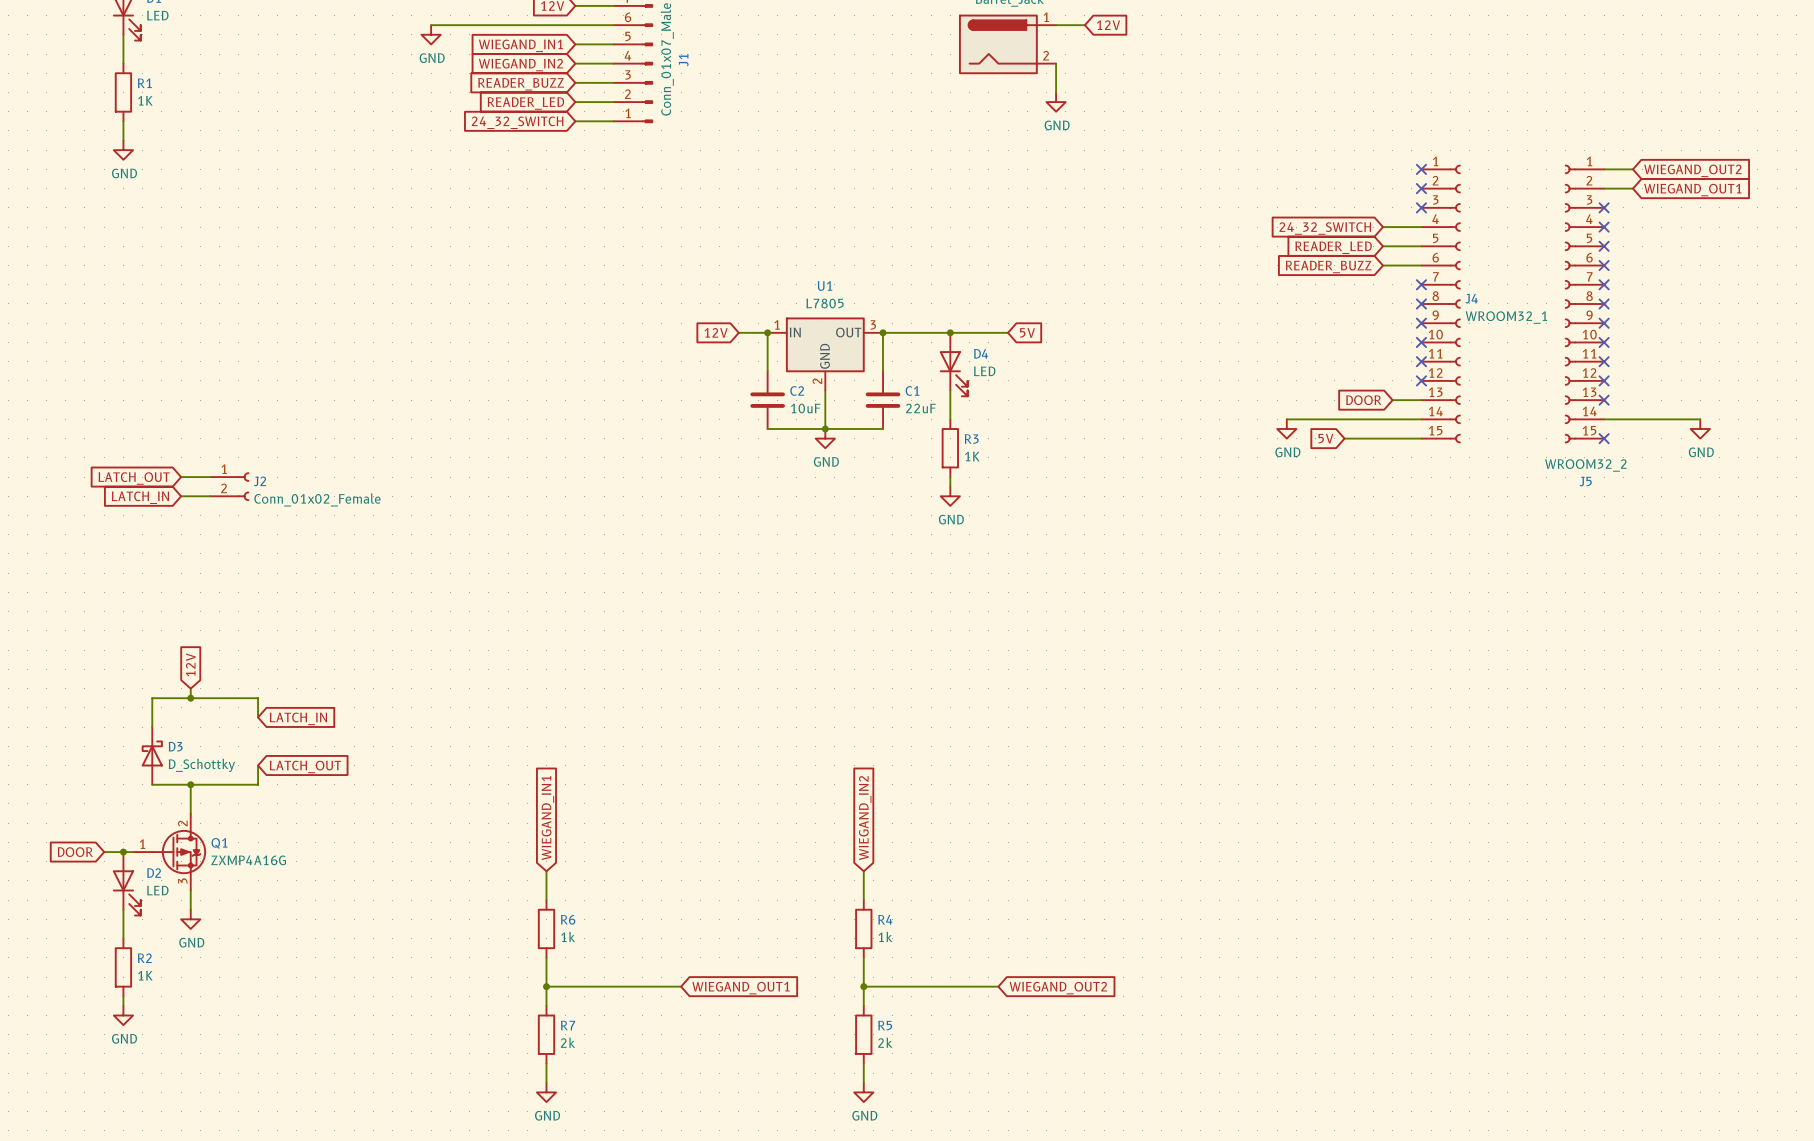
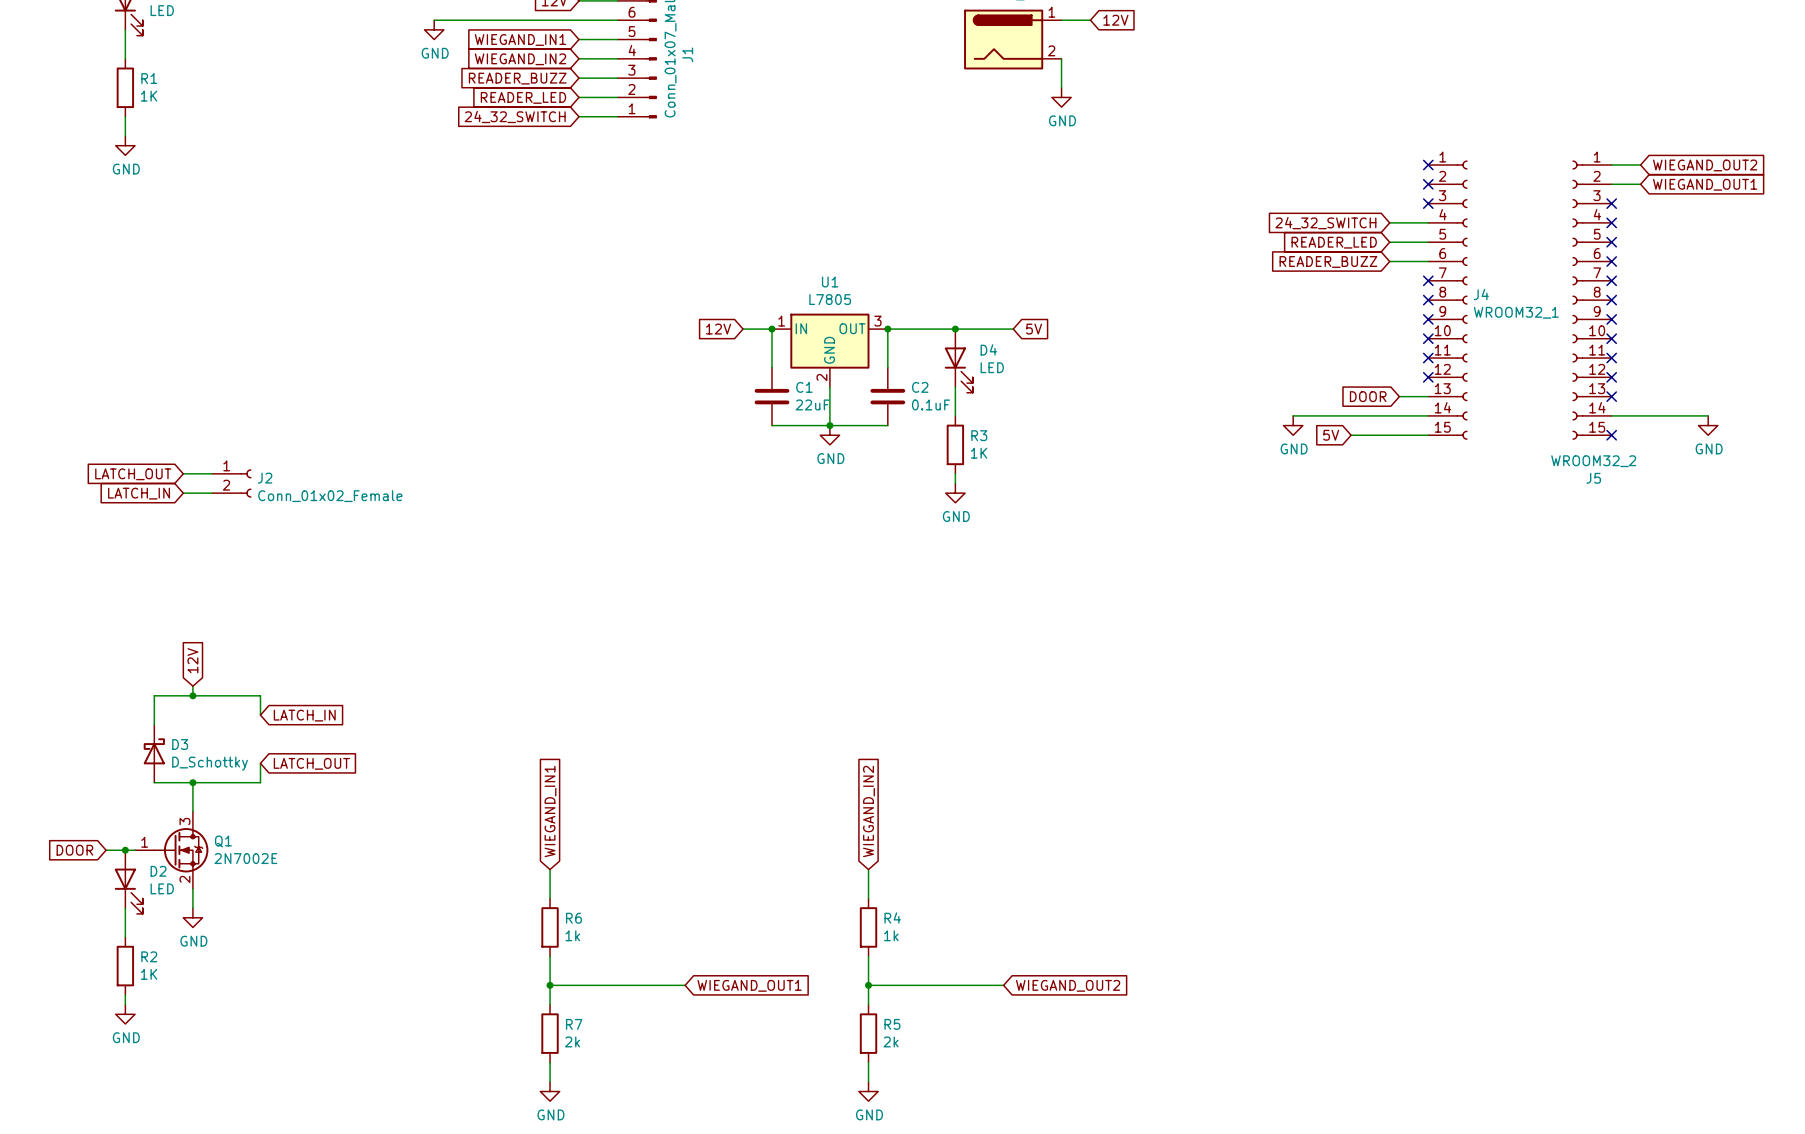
C1 name: C1 (912, 390) -> C2 (920, 387)
C2 name: C2 (797, 391) -> C1 (804, 387)
C2 value: 10uF (805, 408) -> 22uF (812, 404)
C1 value: 22uF (920, 408) -> 0.1uF (931, 404)
Q1 symbol: [133, 813, 207, 891] -> [135, 811, 209, 889]
Q1 value: ZXMP4A16G (248, 860) -> 2N7002E (245, 858)

